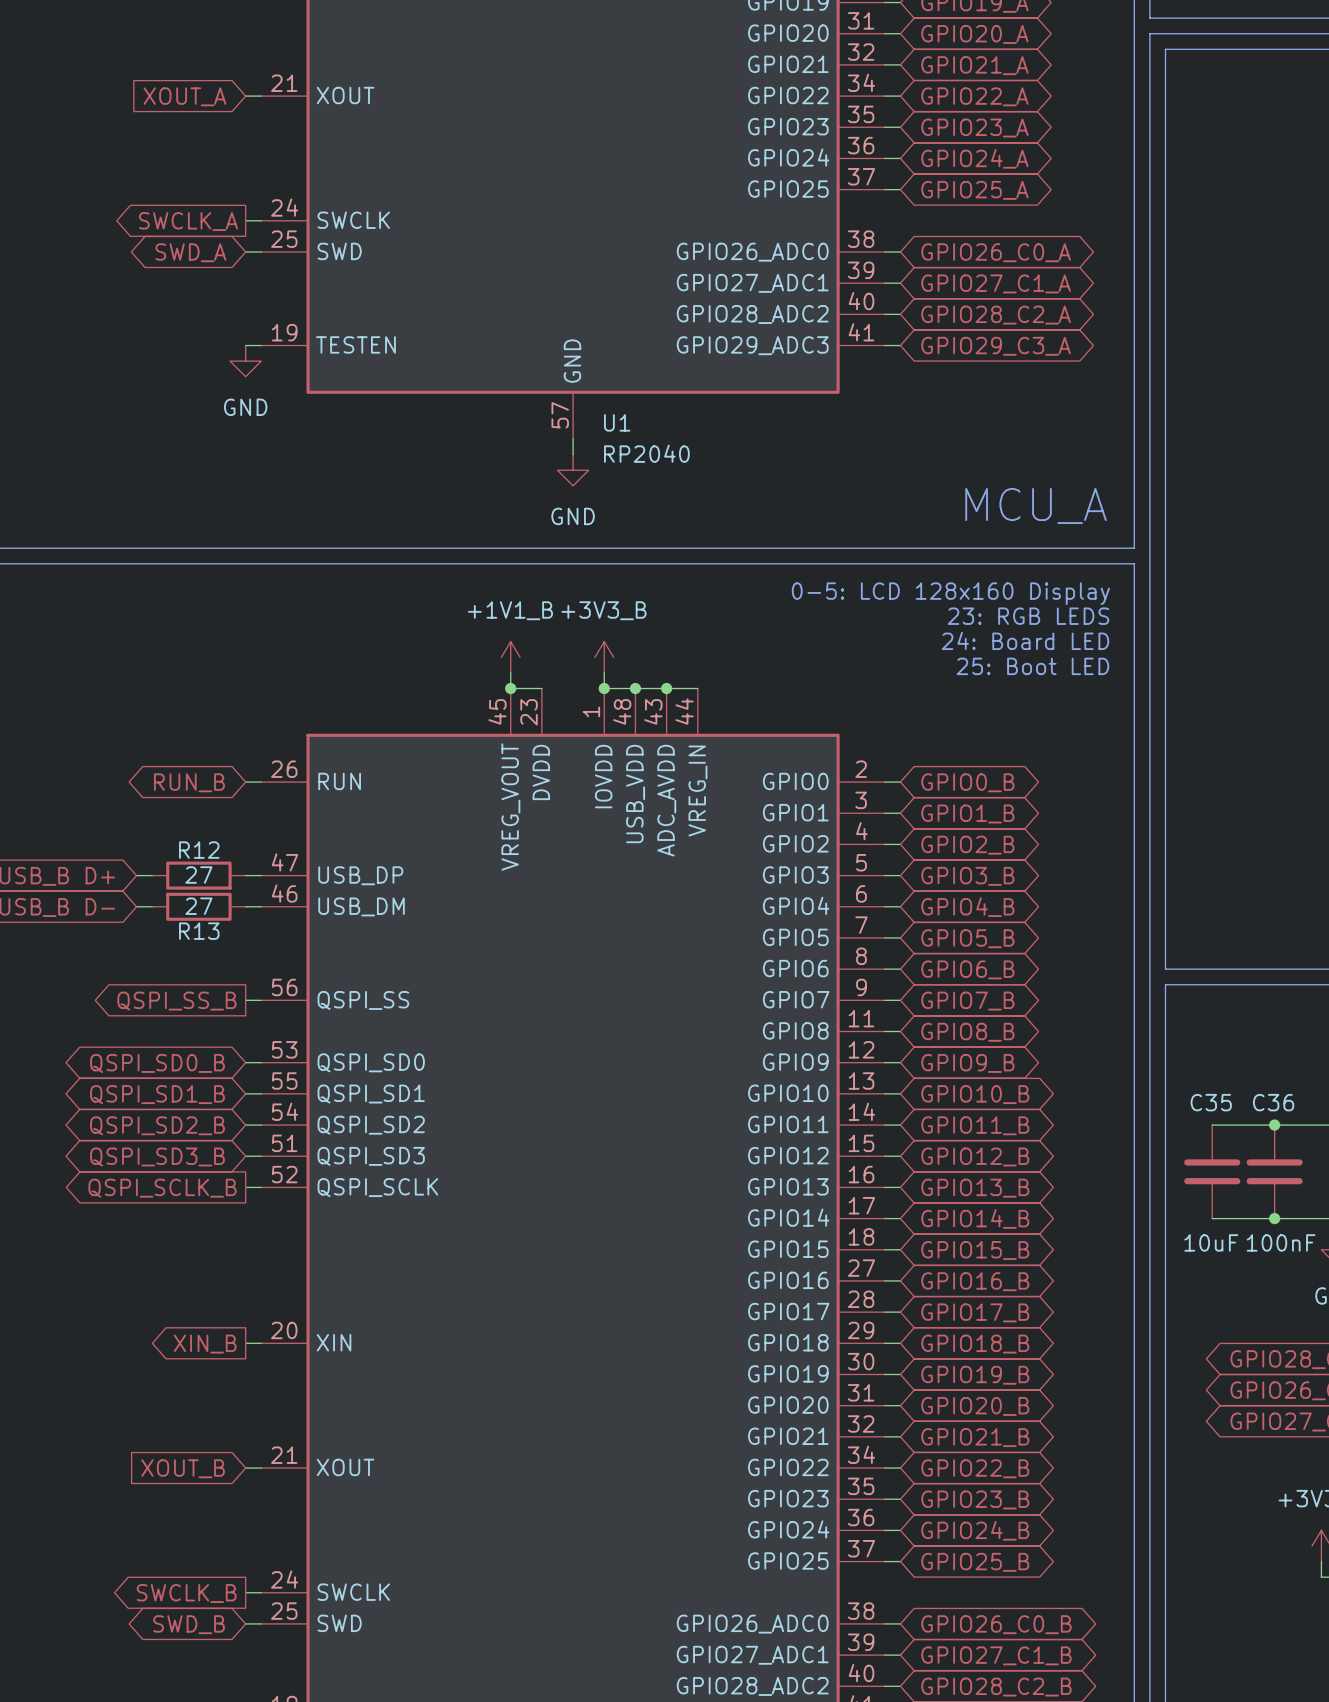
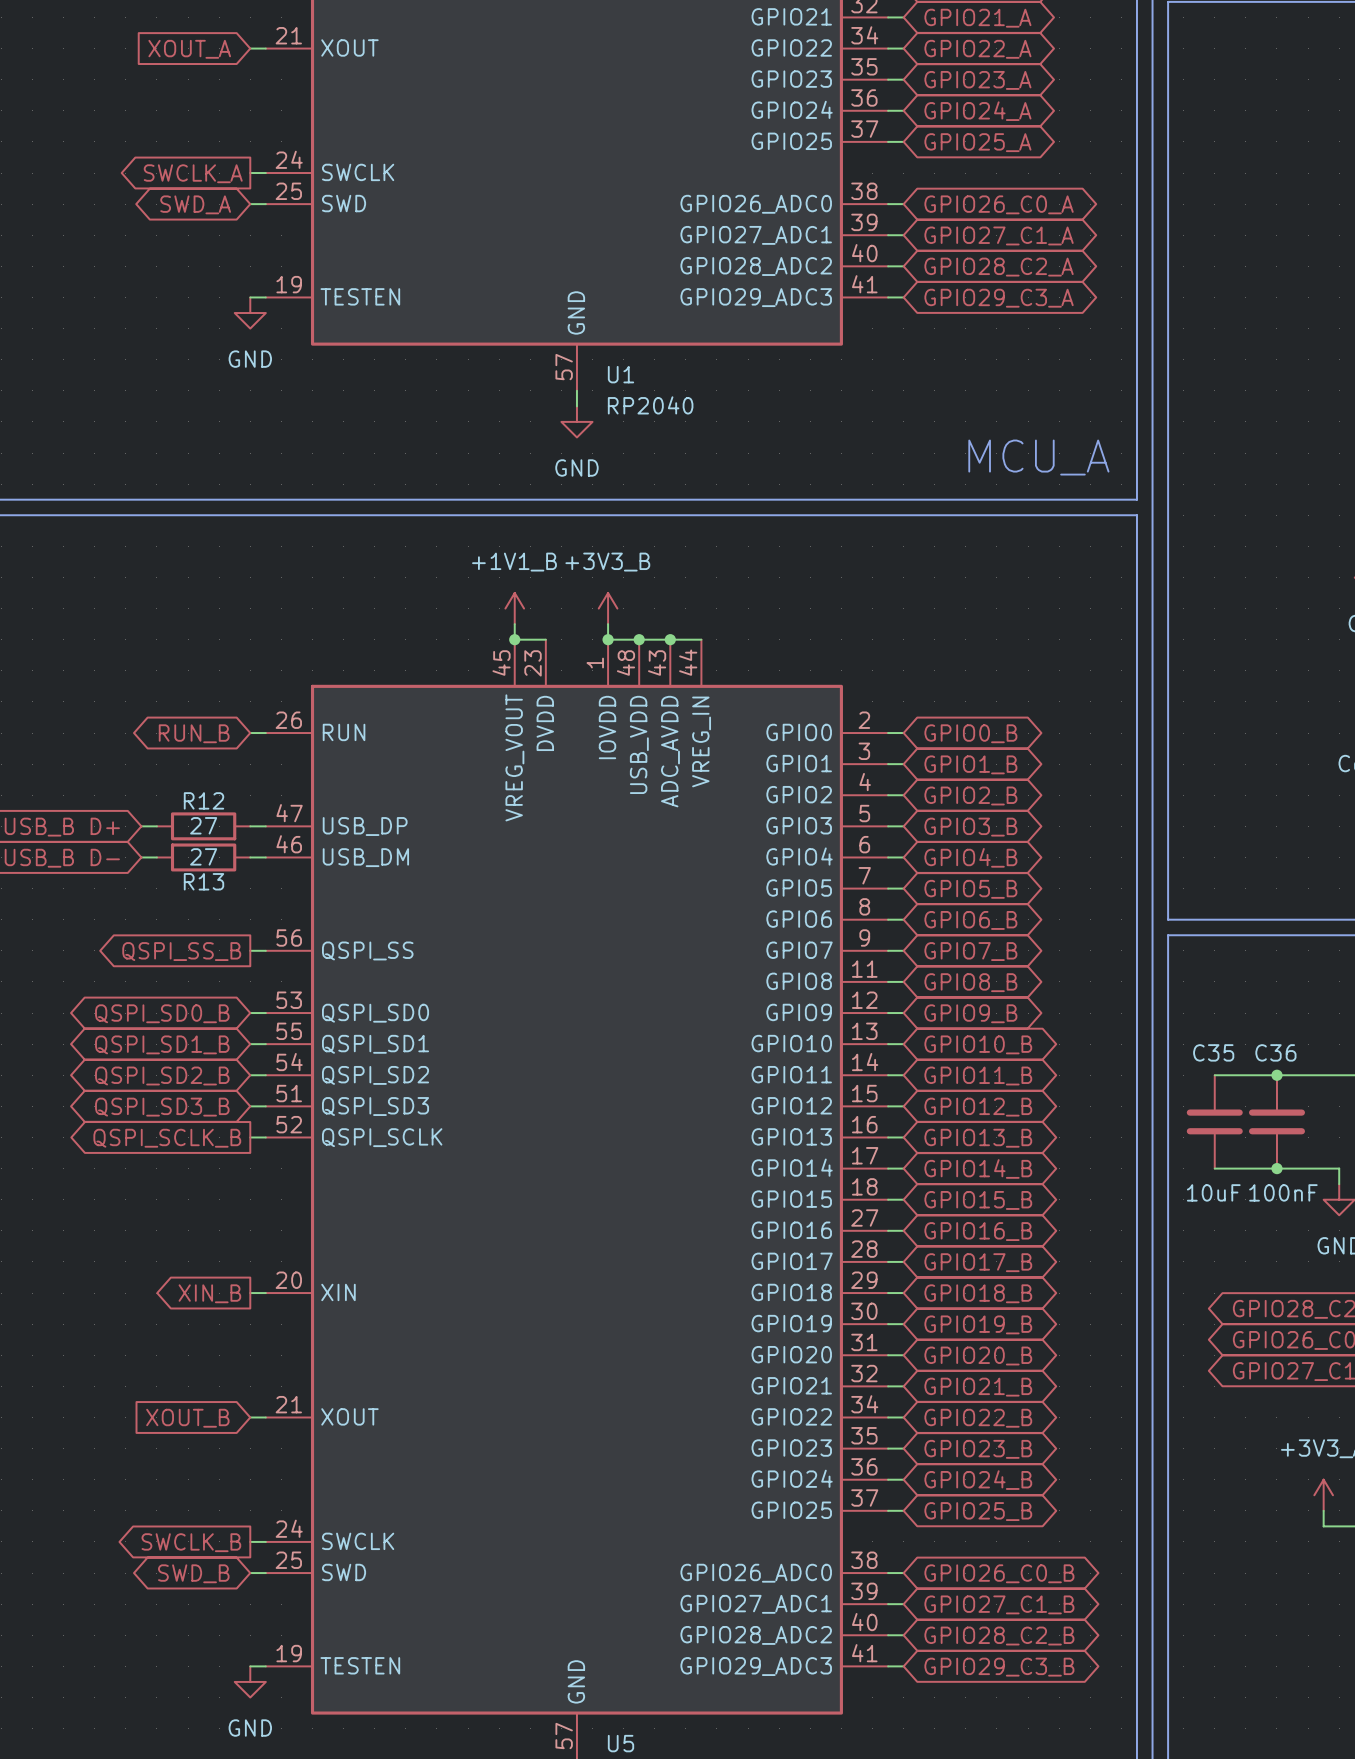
text: 0-5: LCD 128x160 Display (950, 593) -> none
text: 23: RGB LEDS (1028, 616) -> none
text: 24: Board LED (1025, 640) -> none
text: 25: Boot LED (1032, 666) -> none

